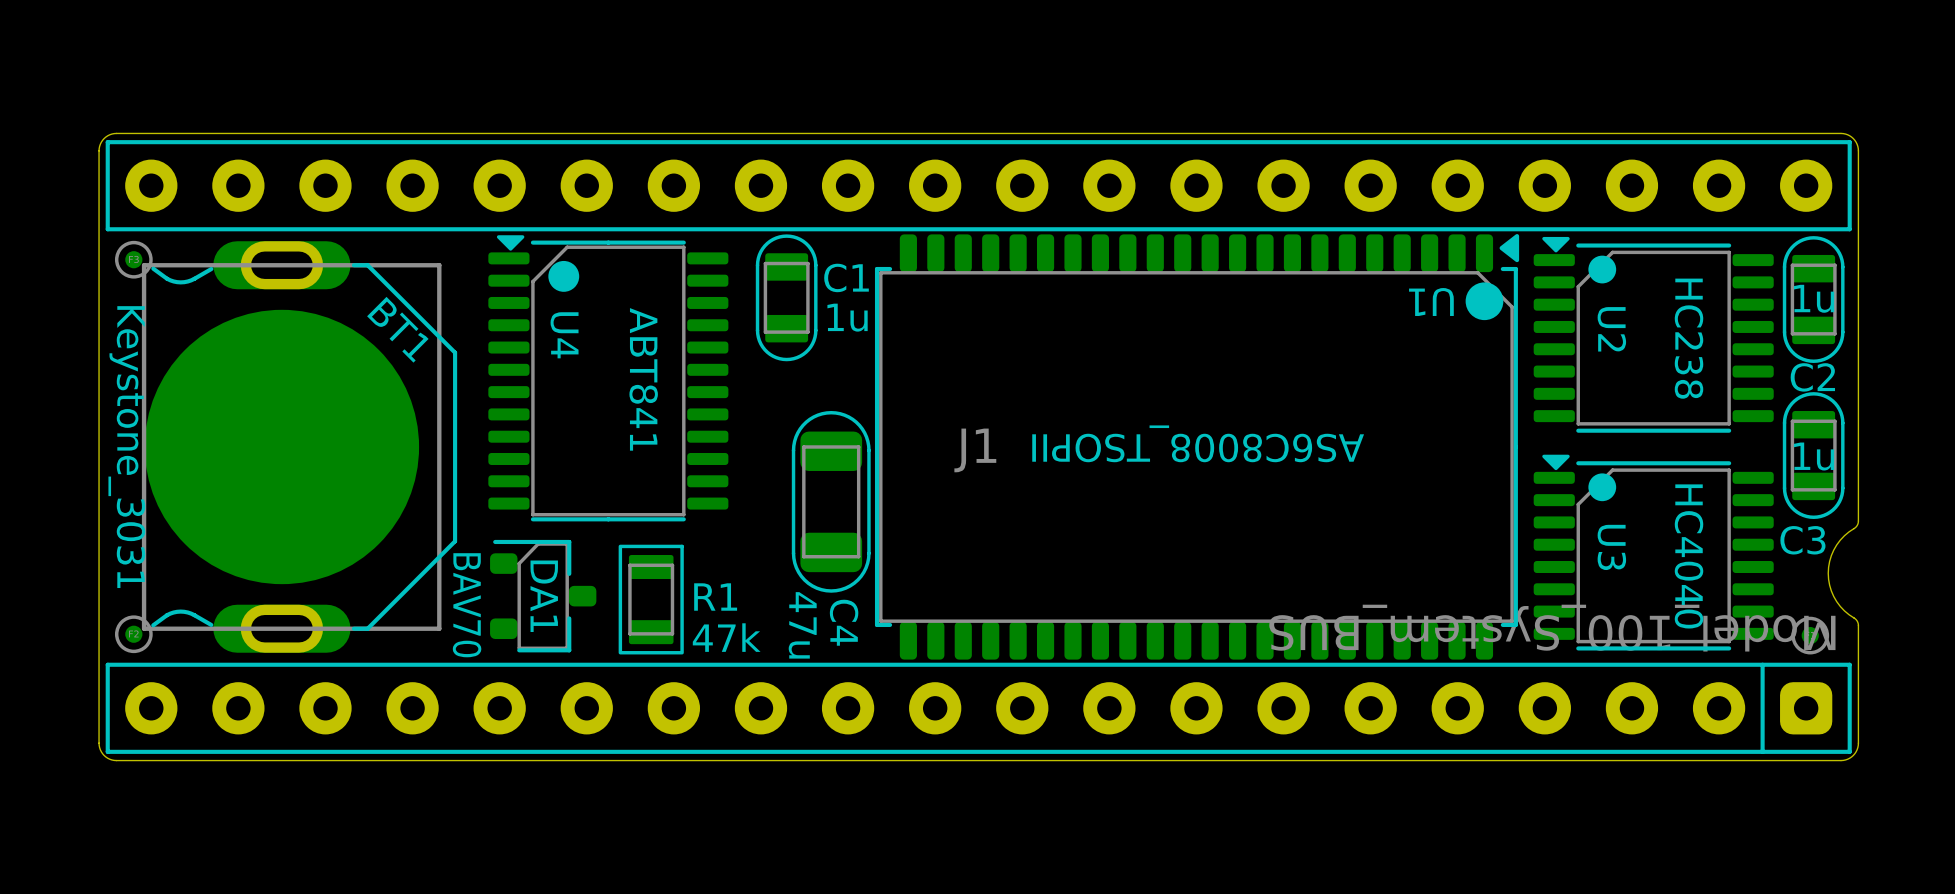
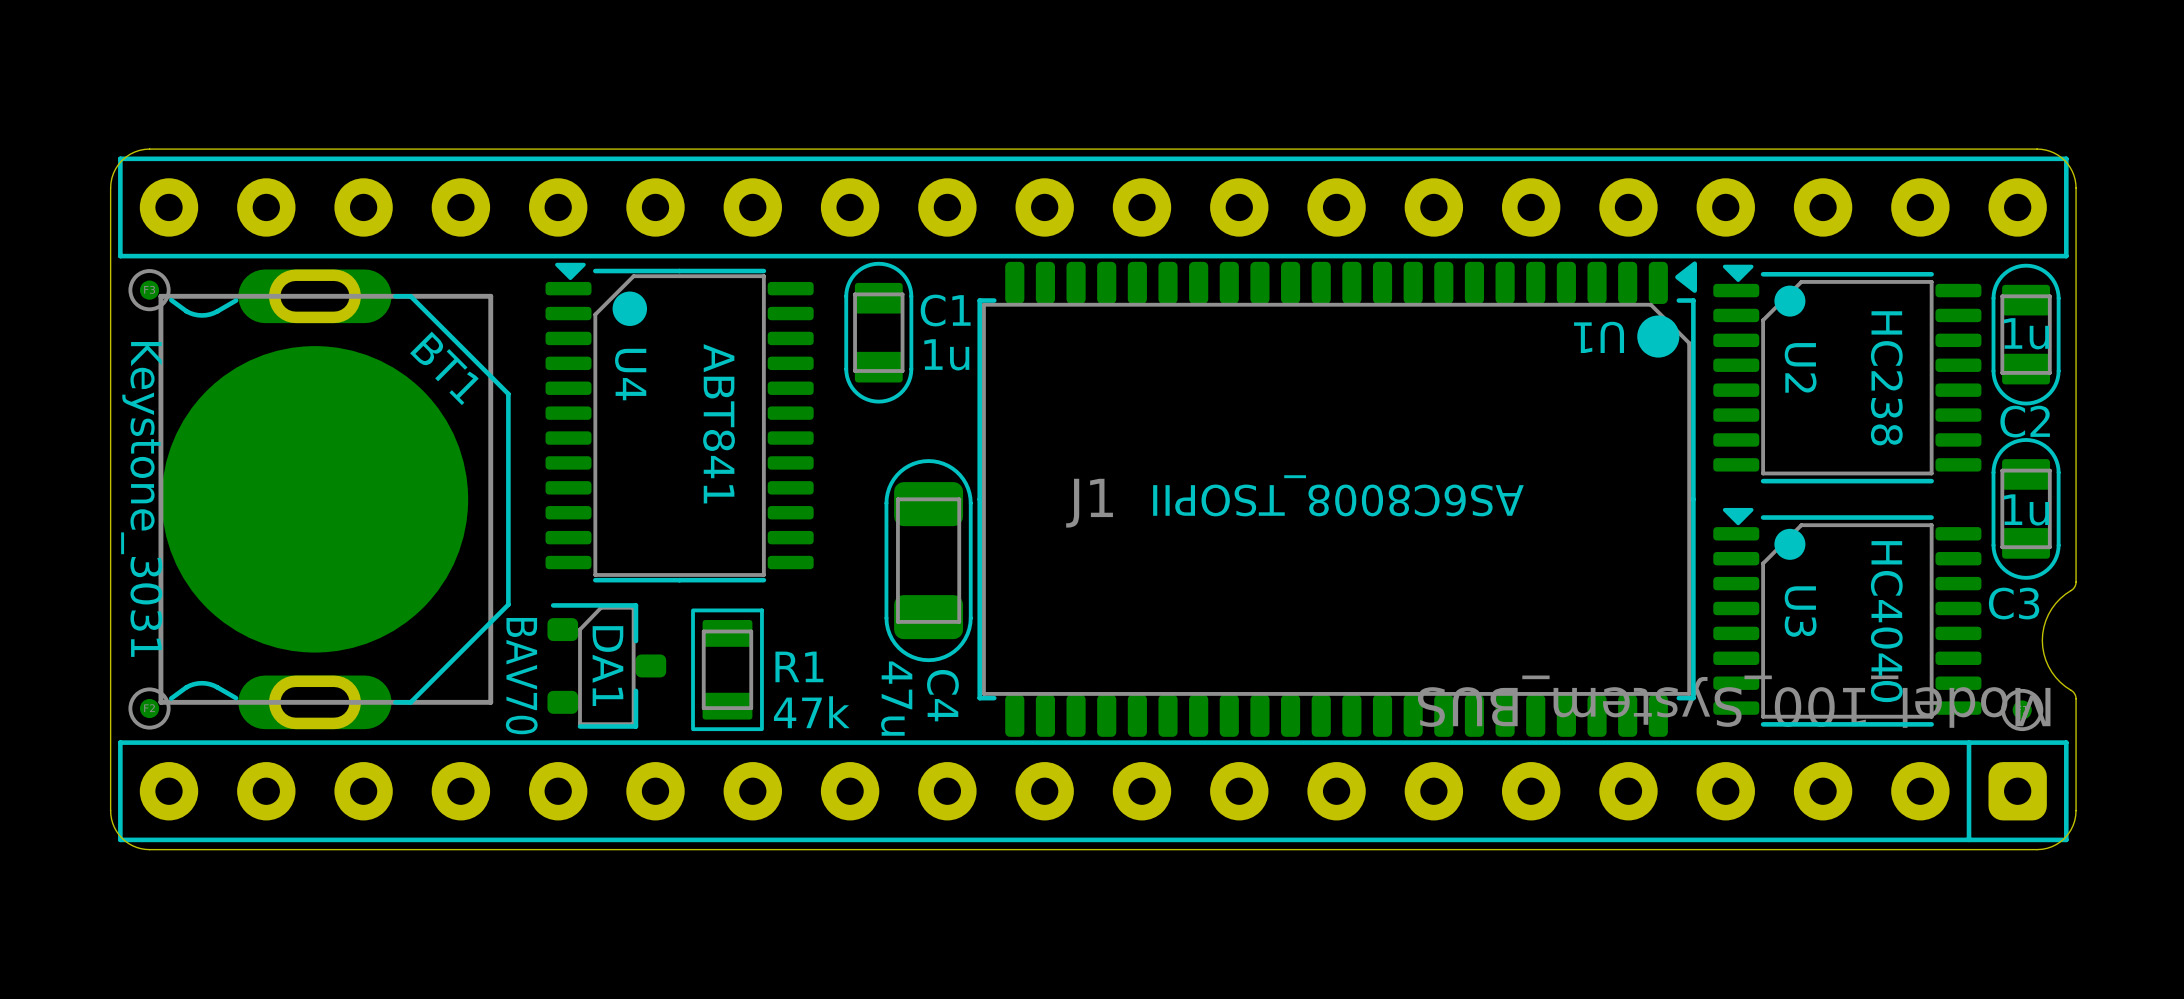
J1 footprint: [98, 133, 1859, 761] -> [110, 148, 2077, 851]

